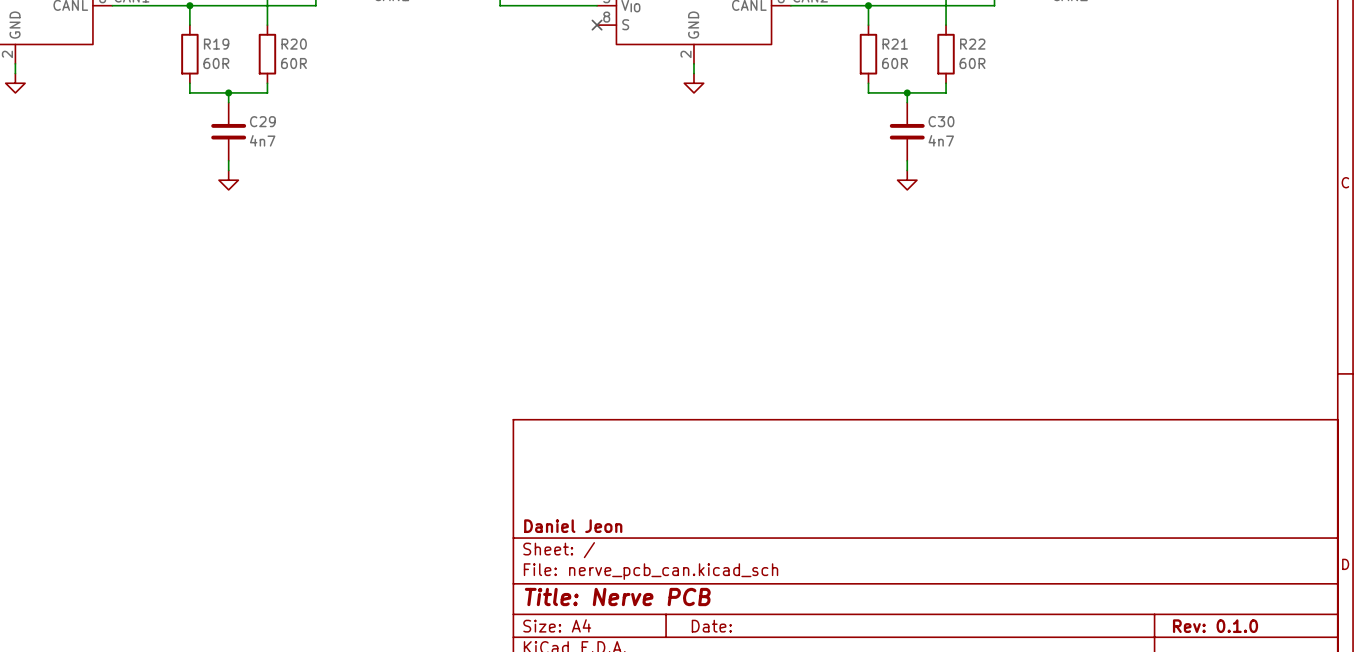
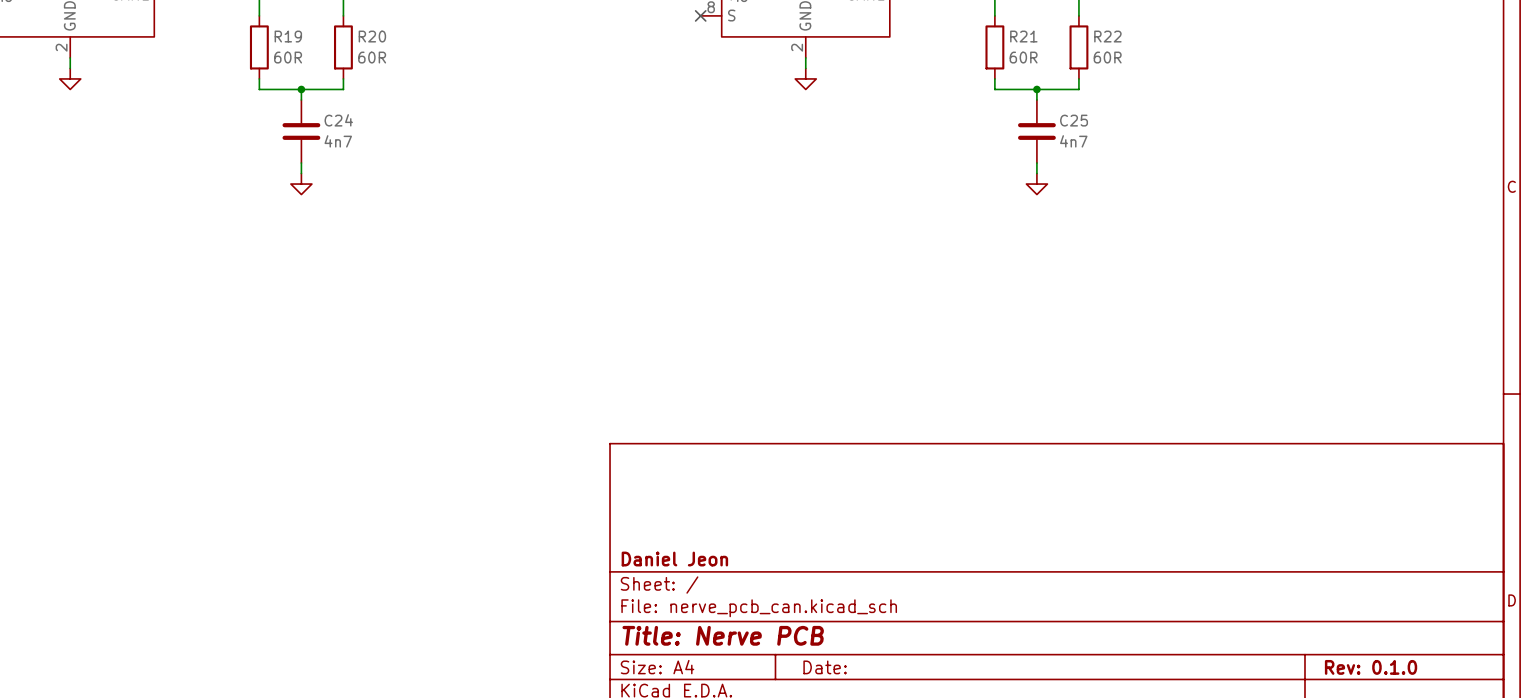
C29 name: C29 (262, 121) -> C24 (338, 120)
C30 name: C30 (941, 121) -> C25 (1074, 120)

